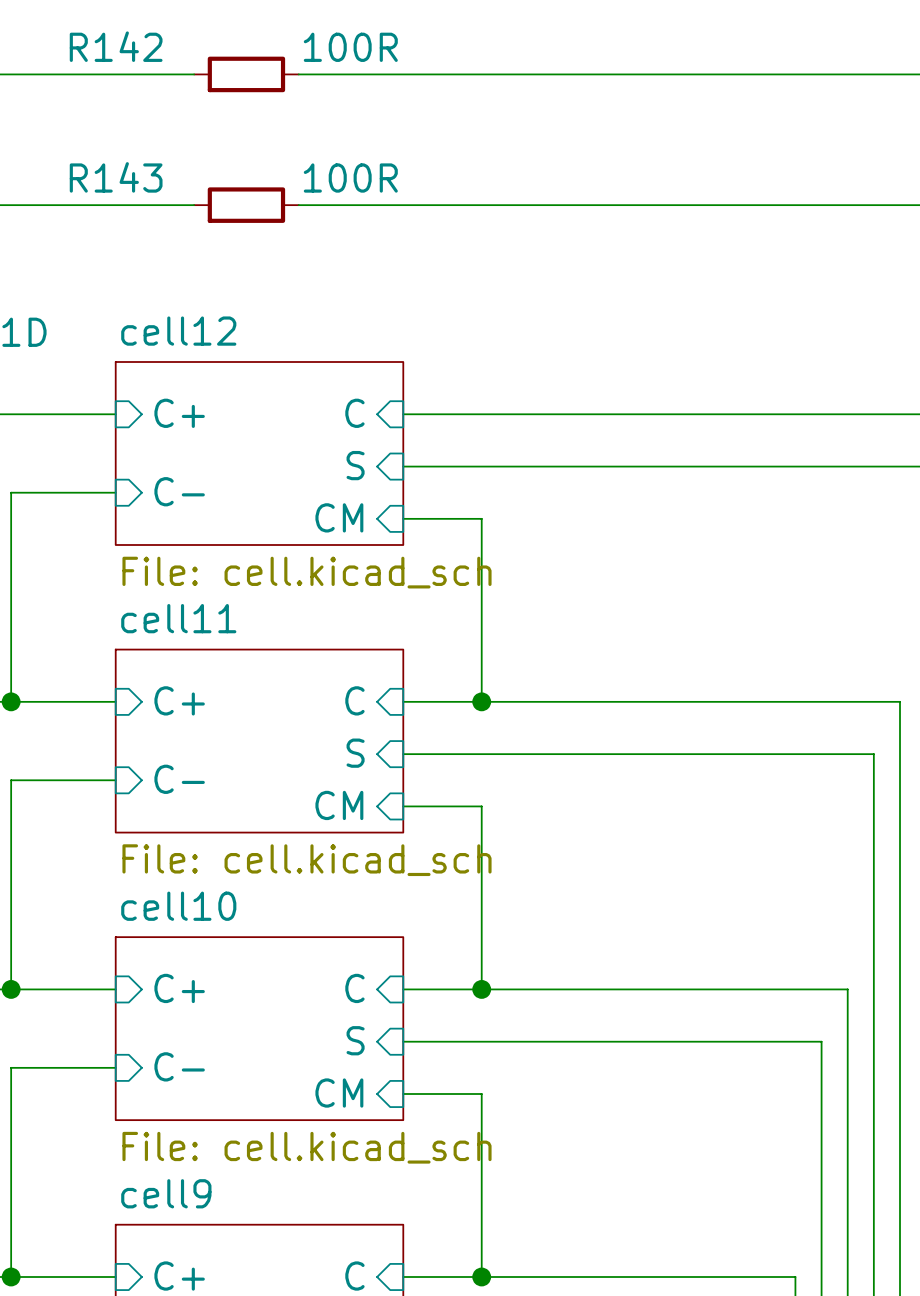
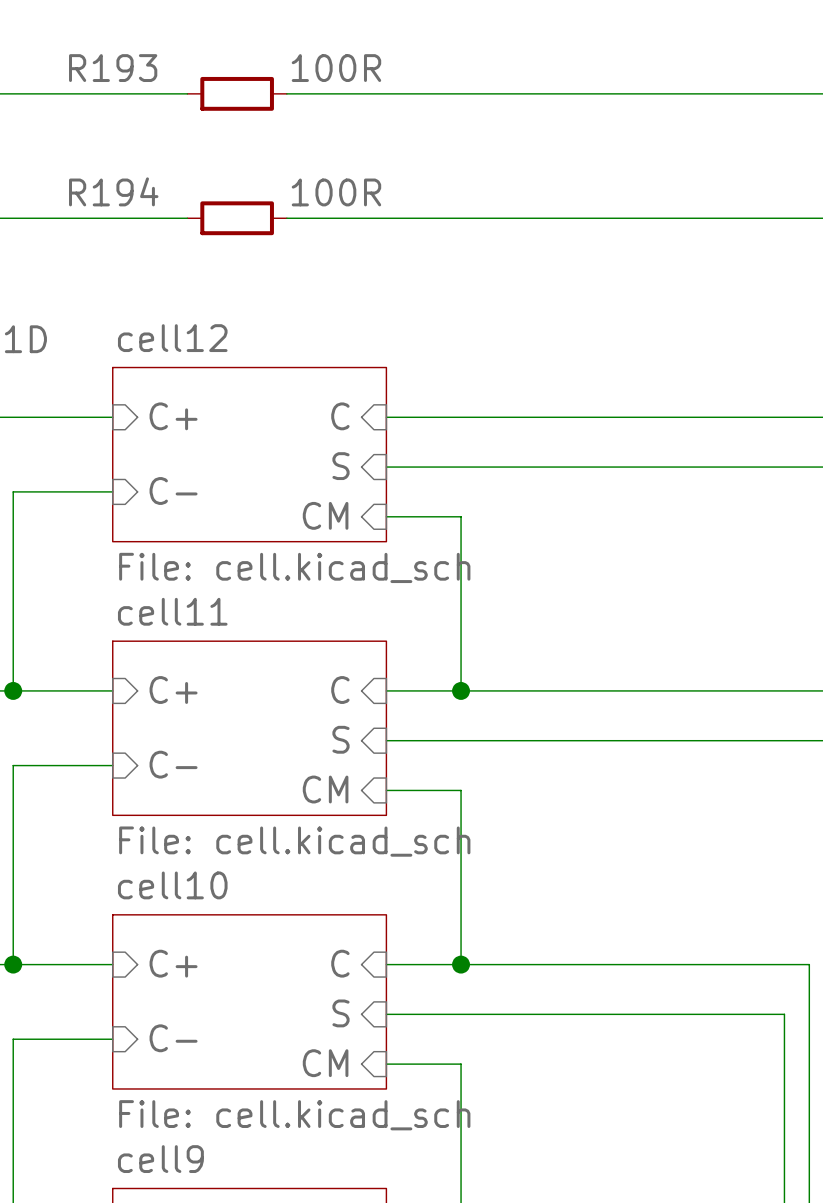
R142 name: R142 (116, 46) -> R193 (113, 68)
R143 name: R143 (116, 177) -> R194 (113, 191)

